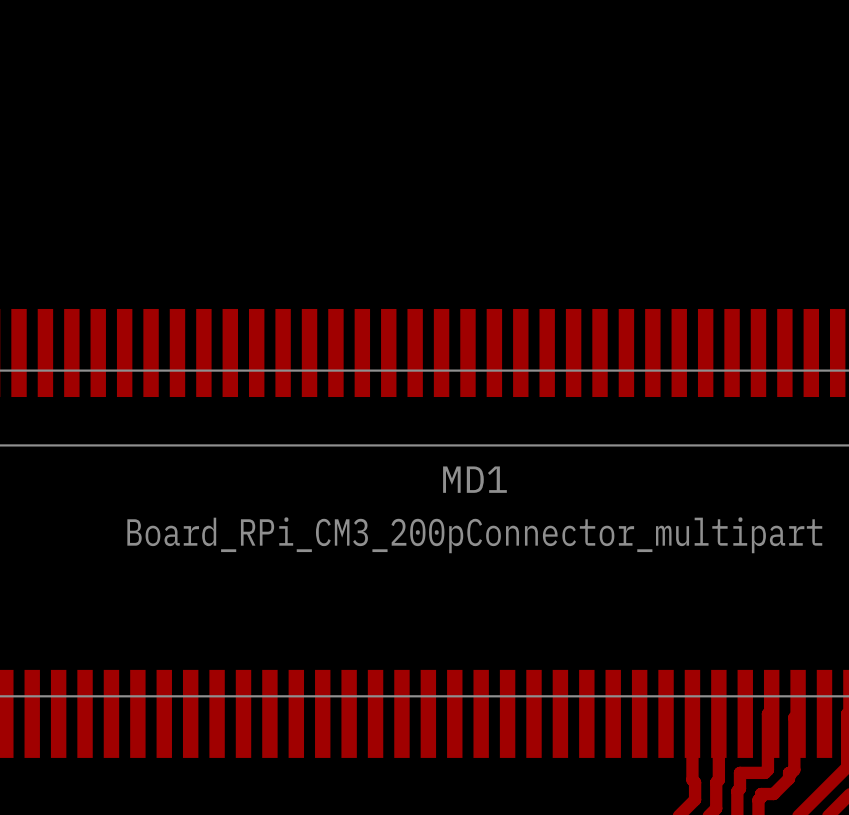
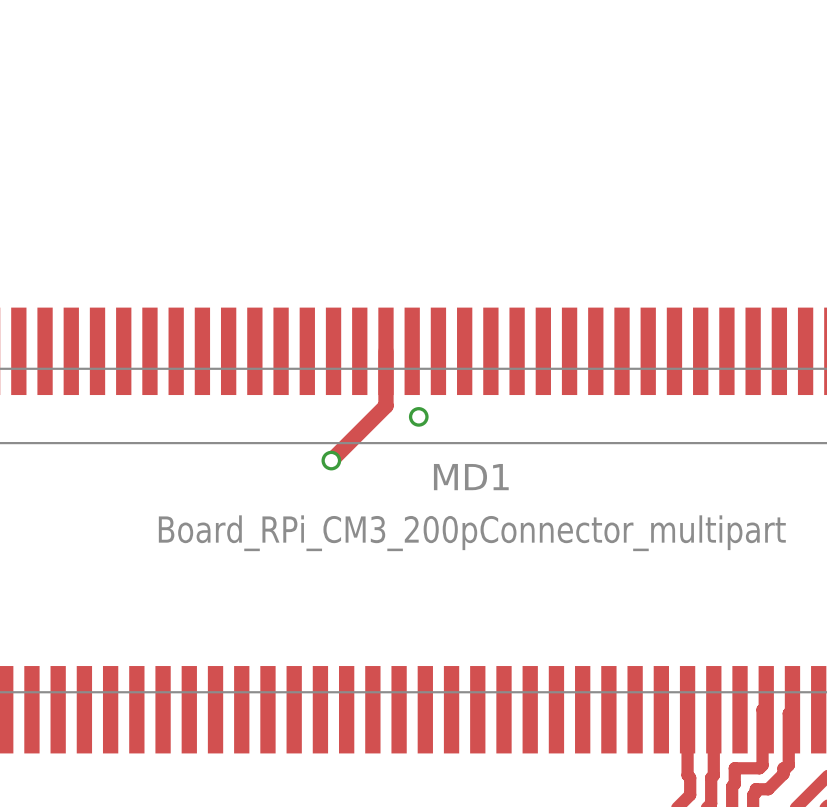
track: none -> (385, 351) (385, 405) (331, 460)
via: none -> (418, 416)
via: none -> (331, 460)

